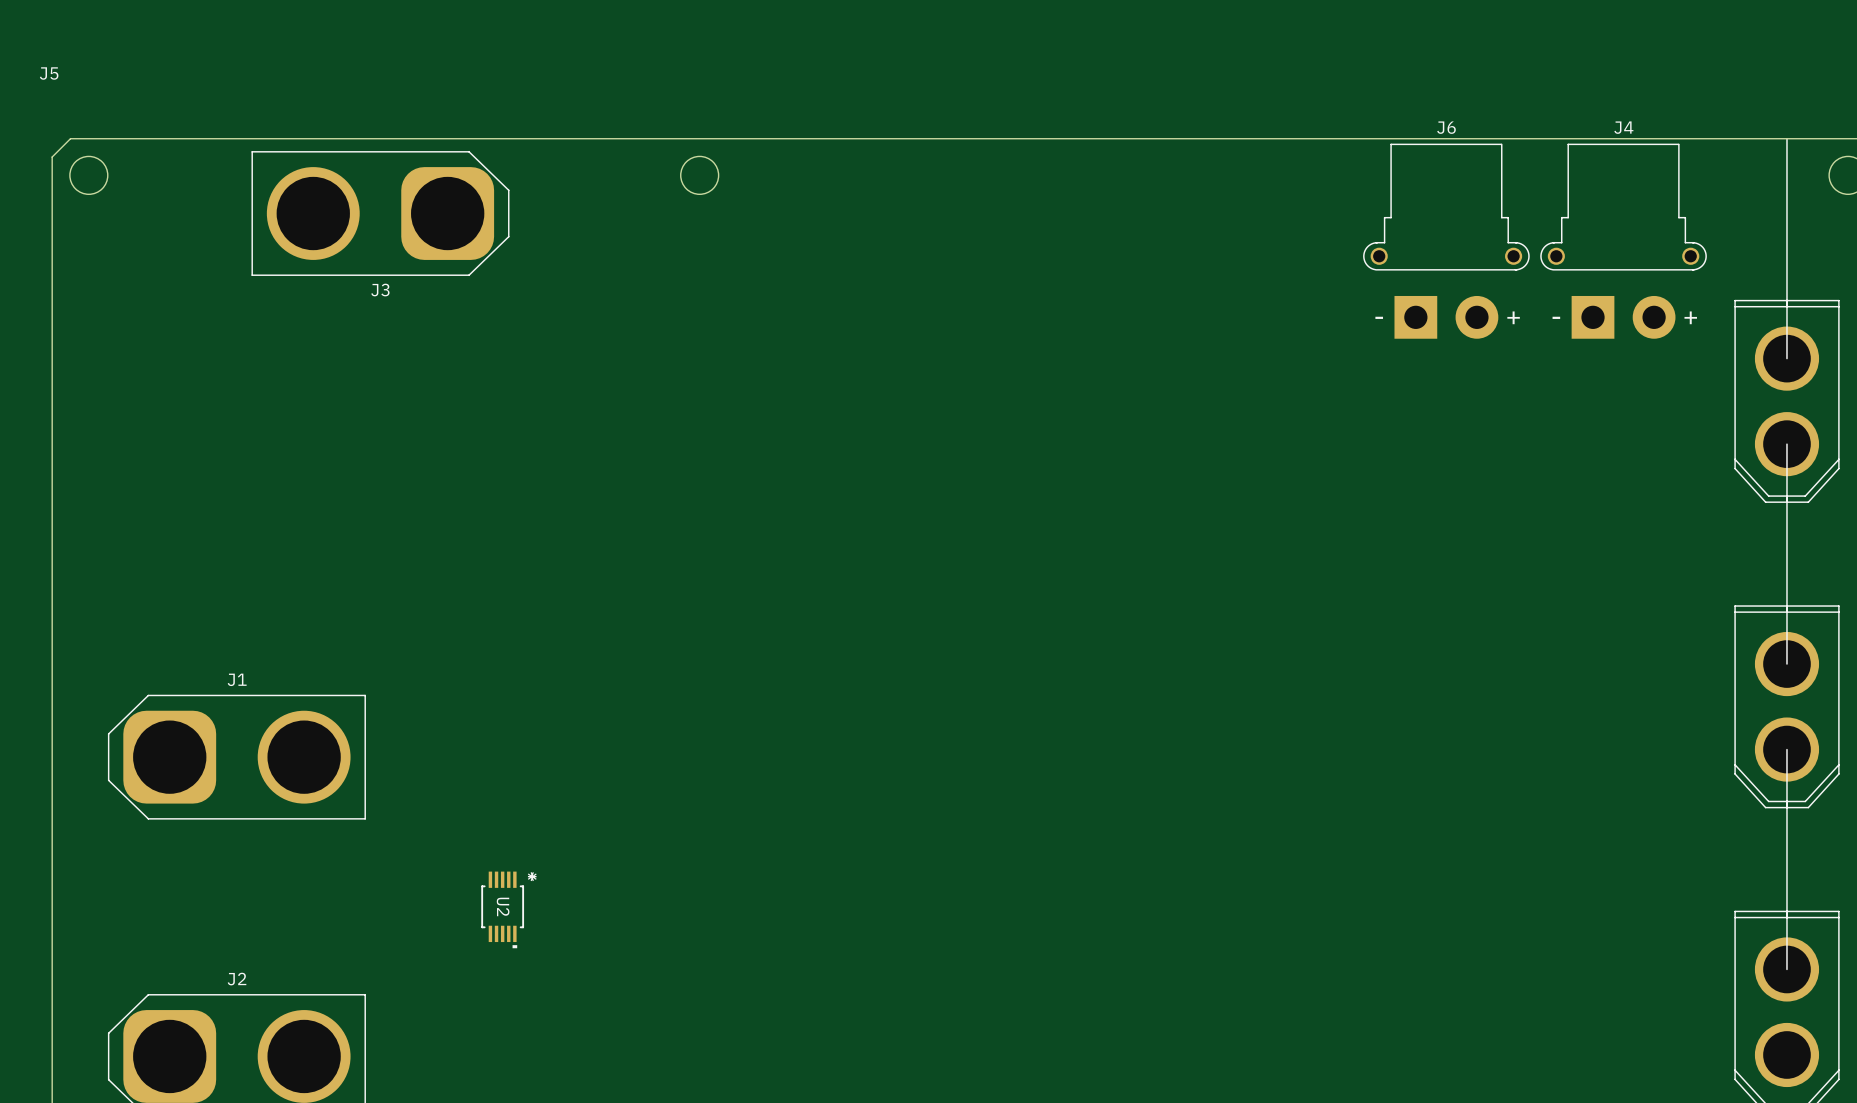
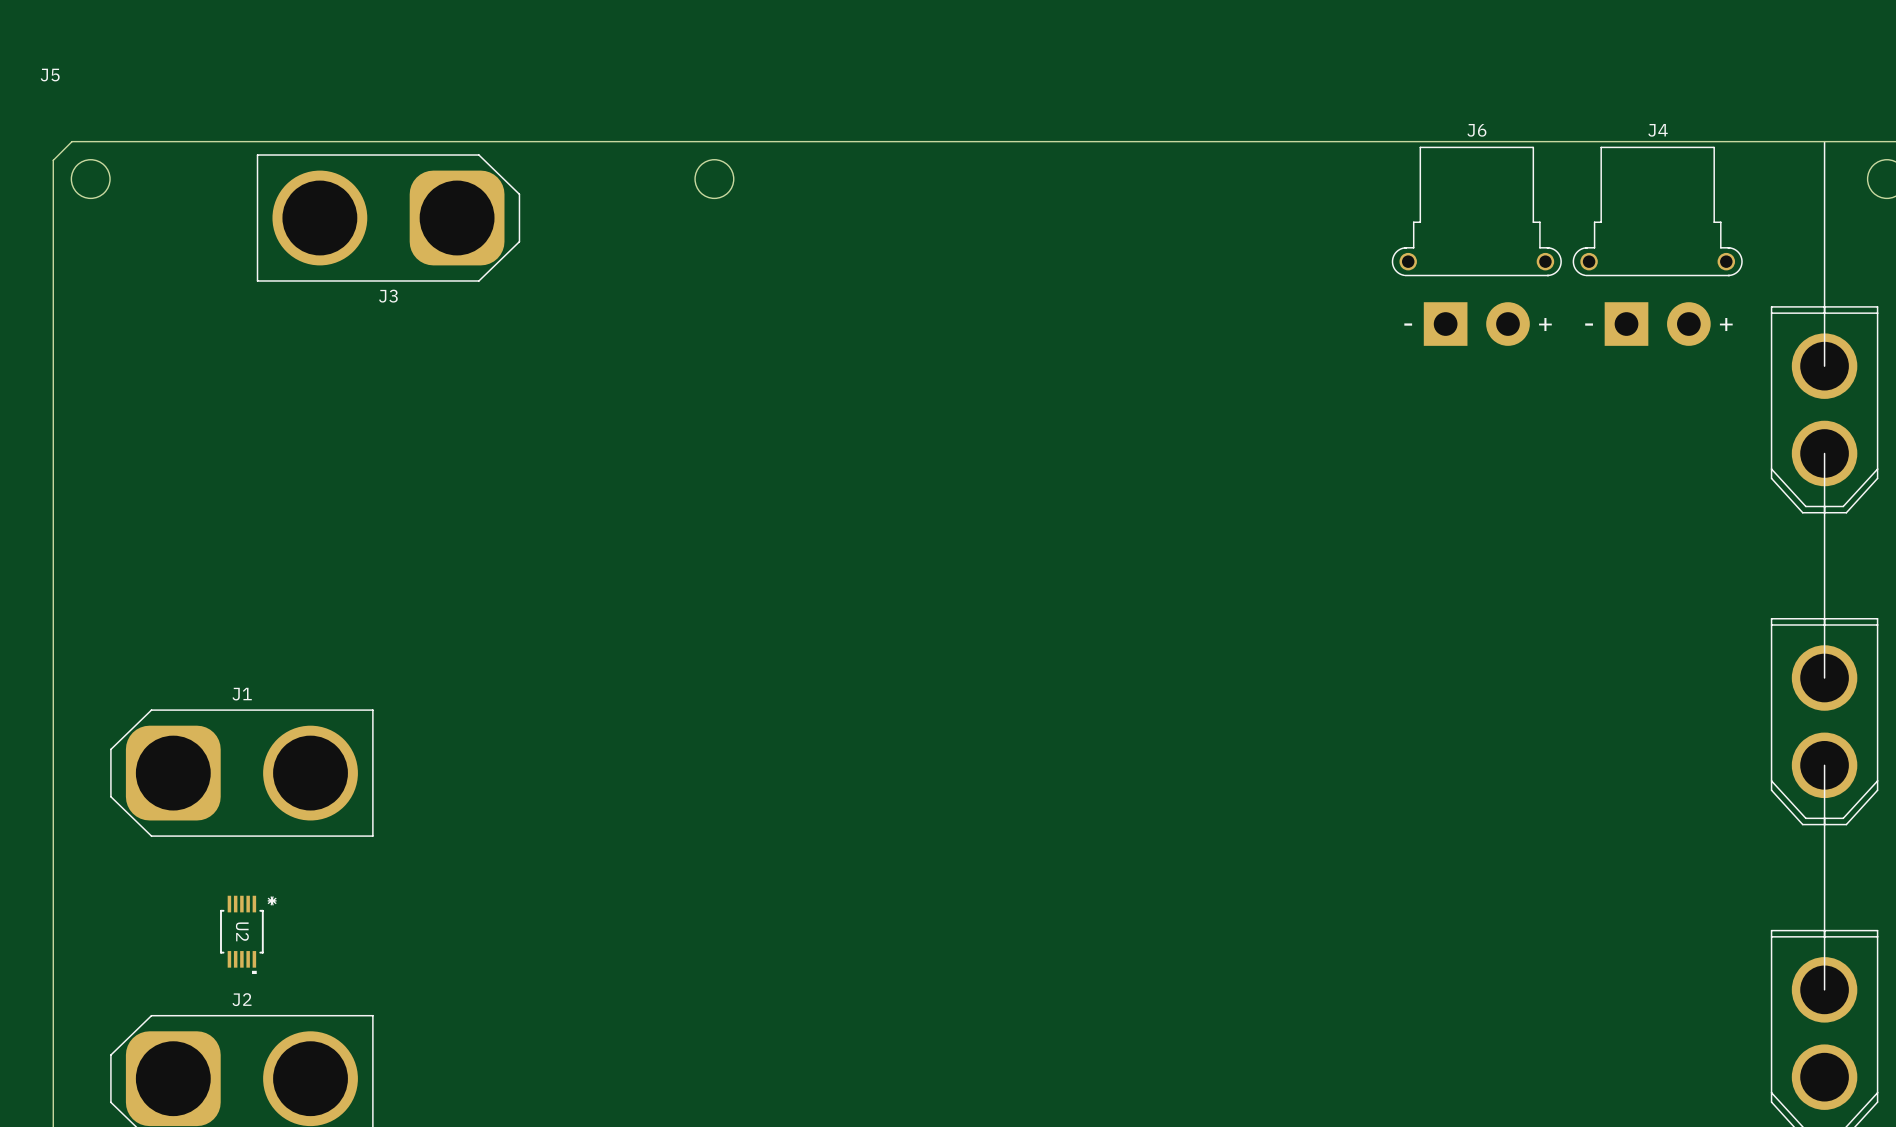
U2 position: (502, 909) -> (241, 934)

